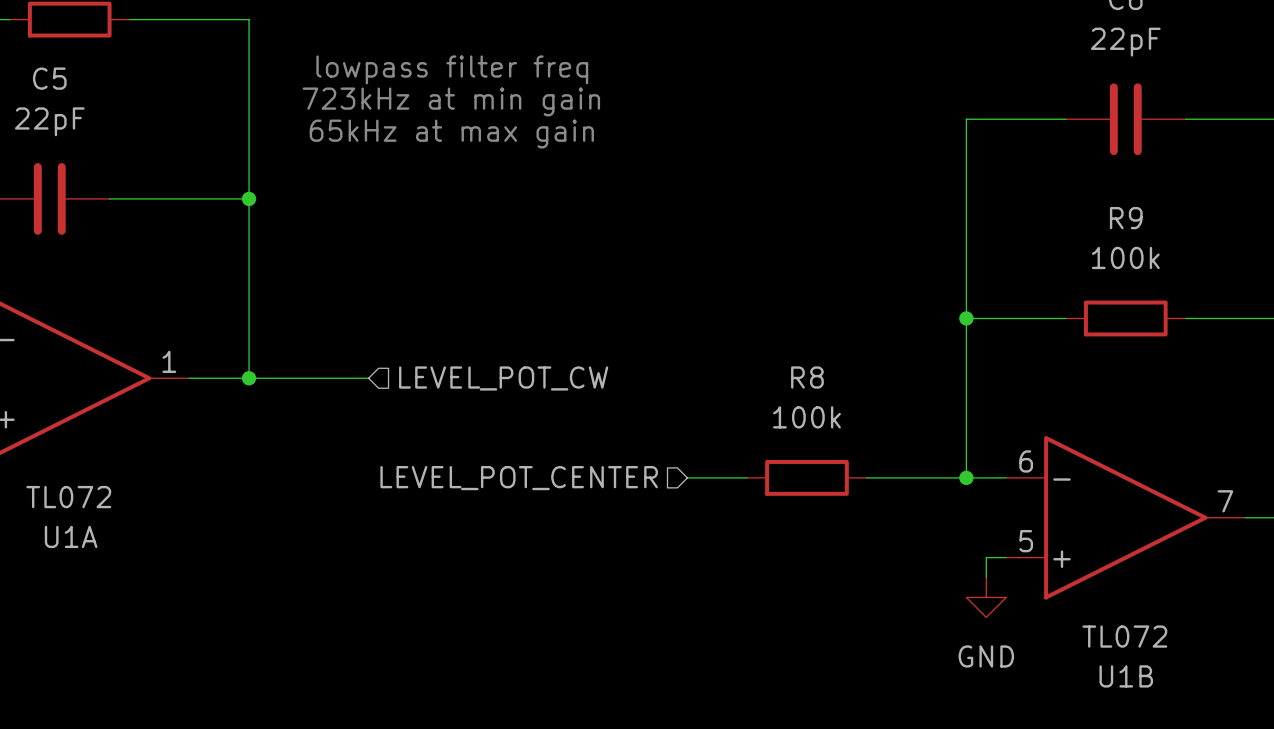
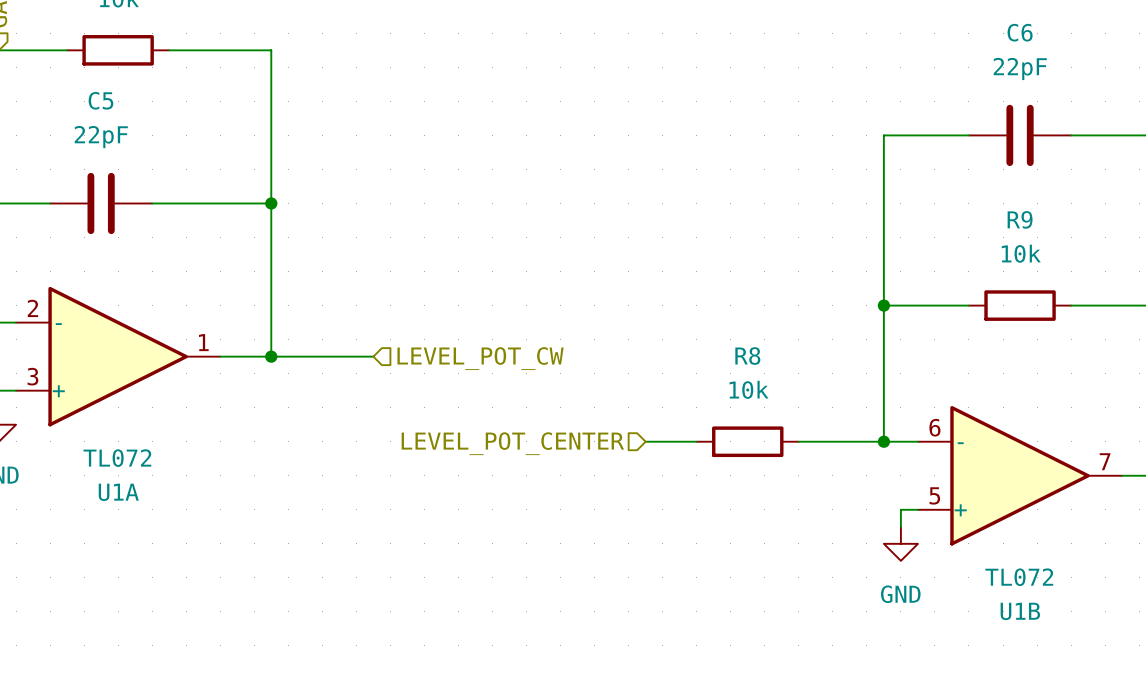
text: lowpass filter freq (452, 69) -> none
text: 723kHz at min gain (451, 101) -> none
text: 65kHz at max gain (451, 134) -> none
R9 value: 100k (1125, 257) -> 10k (1021, 253)
R8 value: 100k (806, 417) -> 10k (748, 389)

